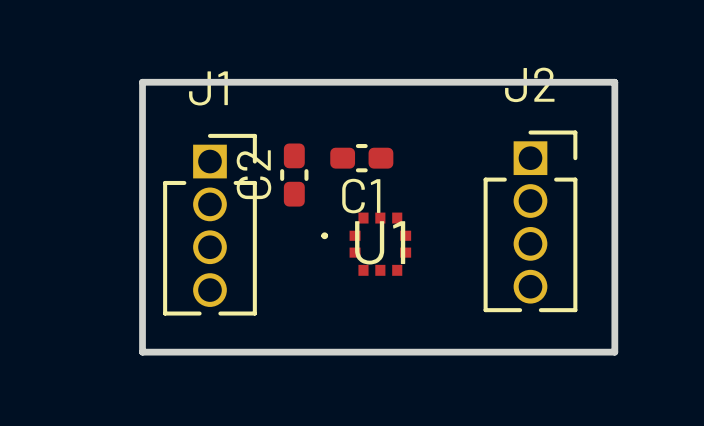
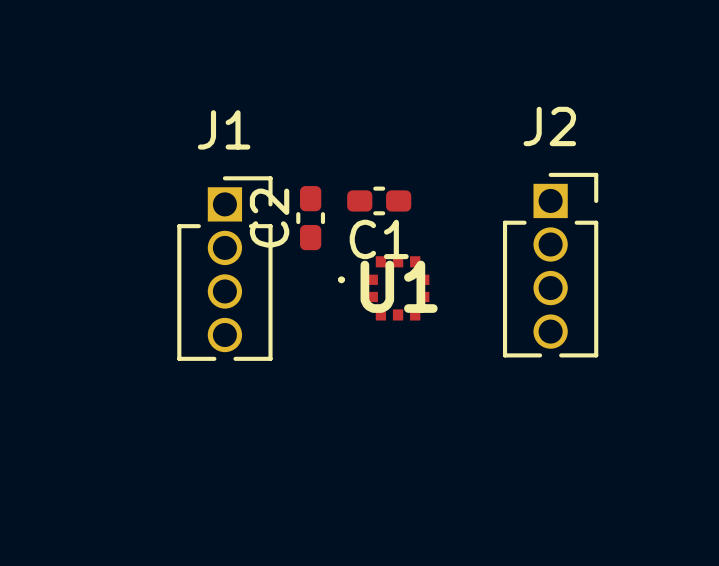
board edge: (142, 82) (614, 82) (614, 352) (142, 352) (142, 82) -> none

